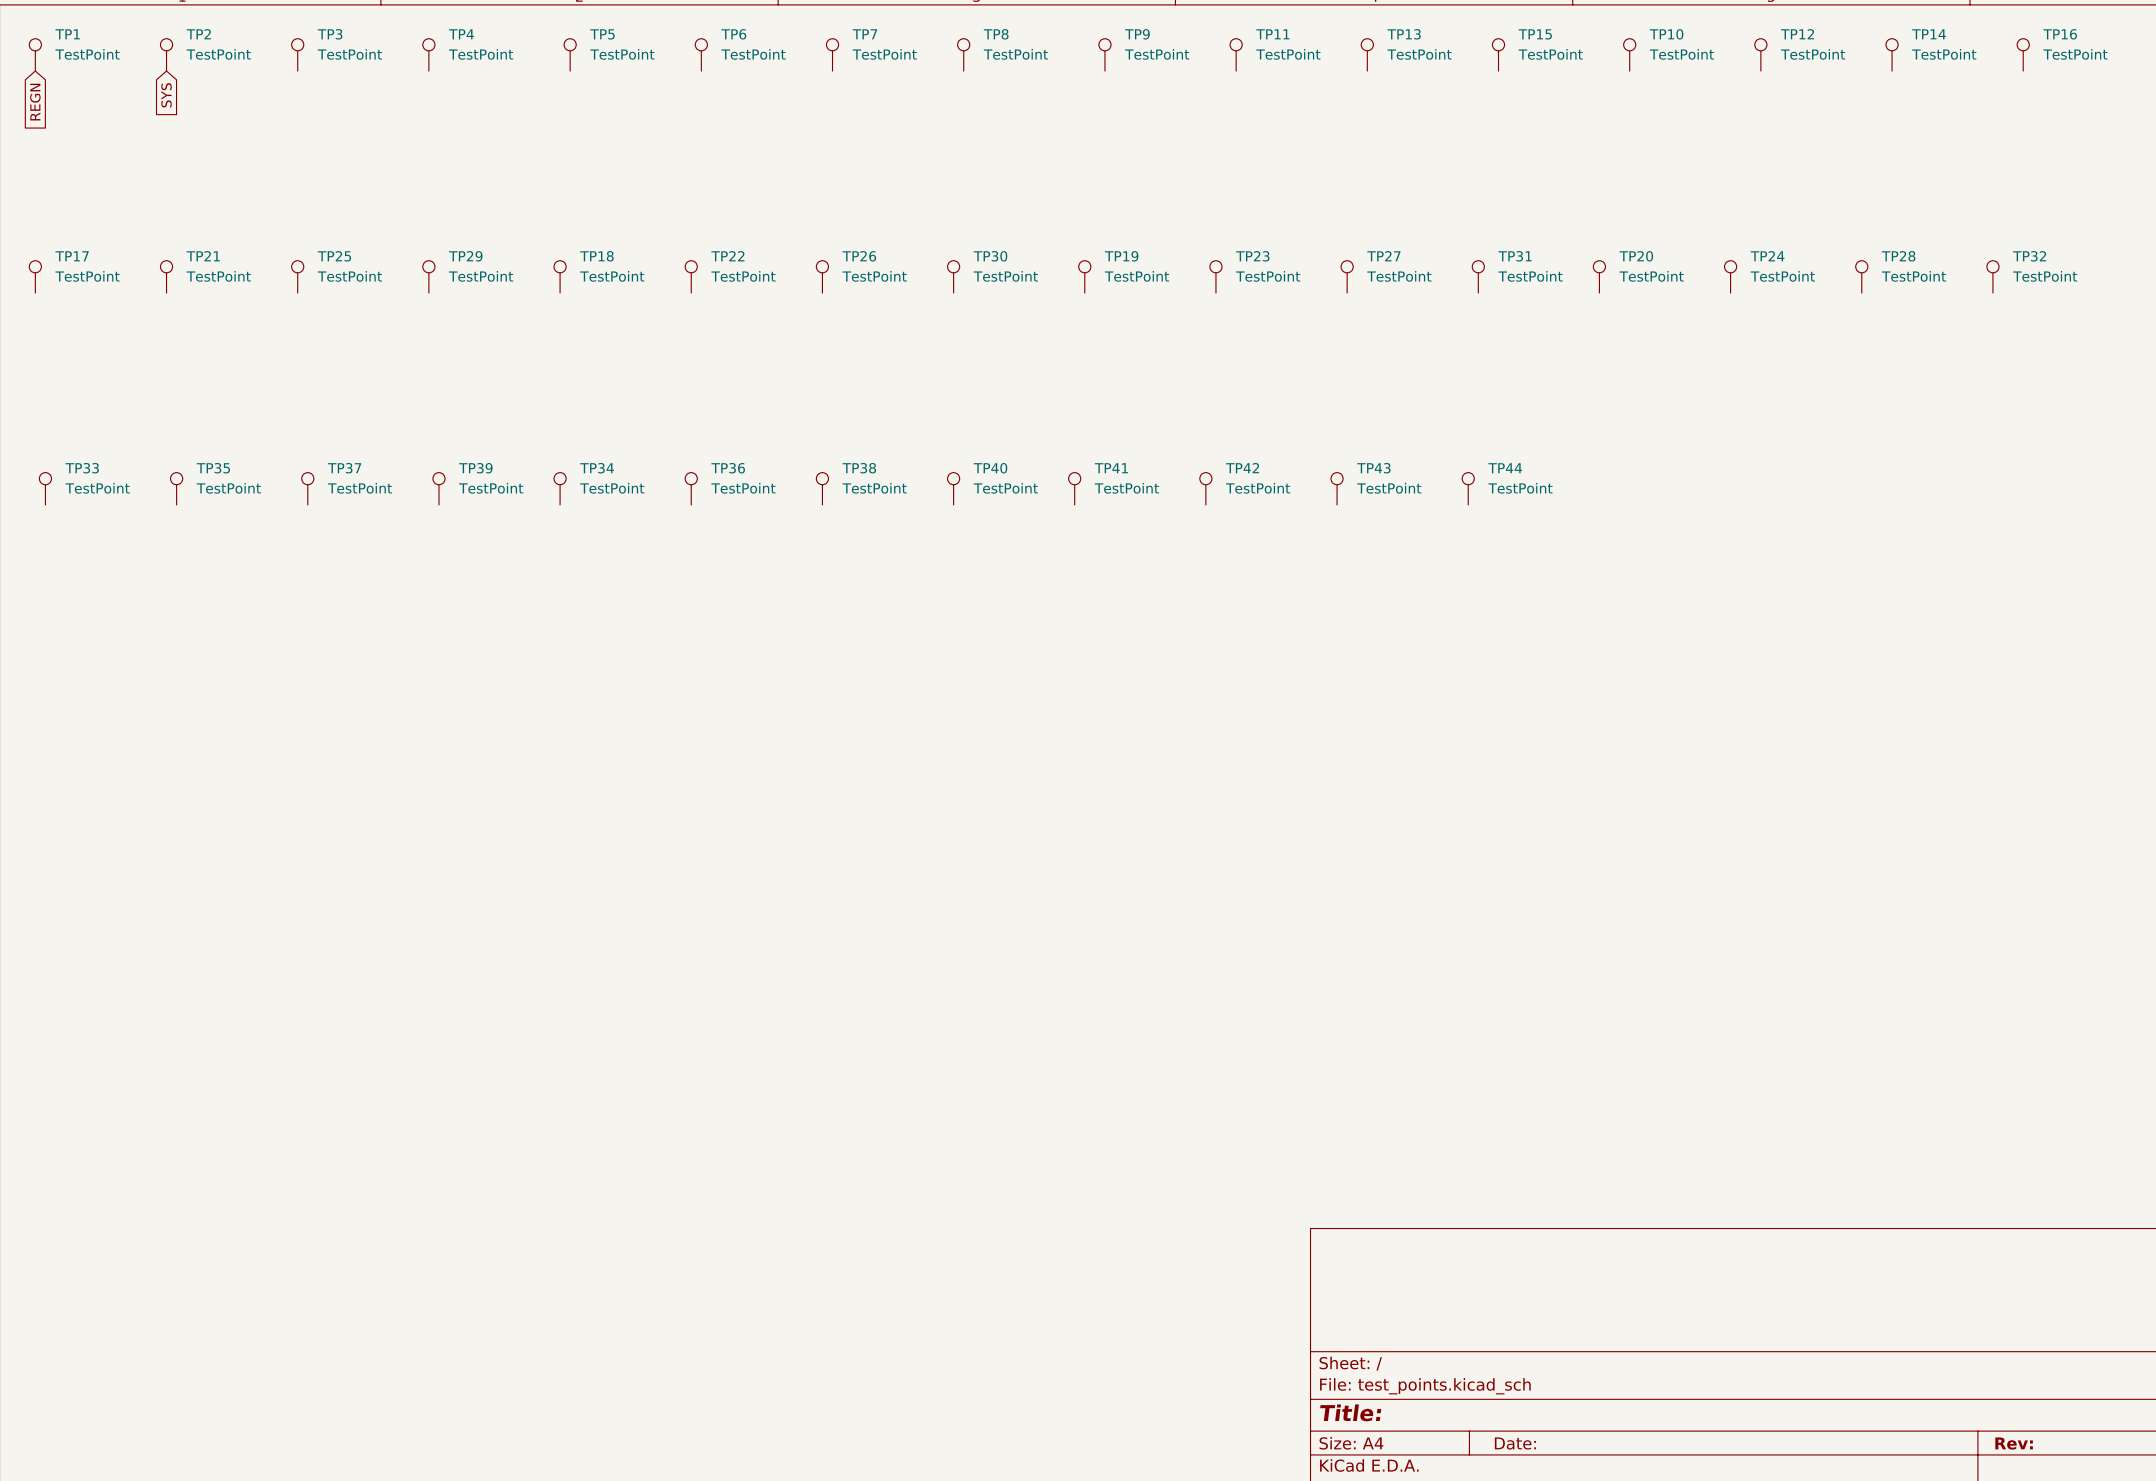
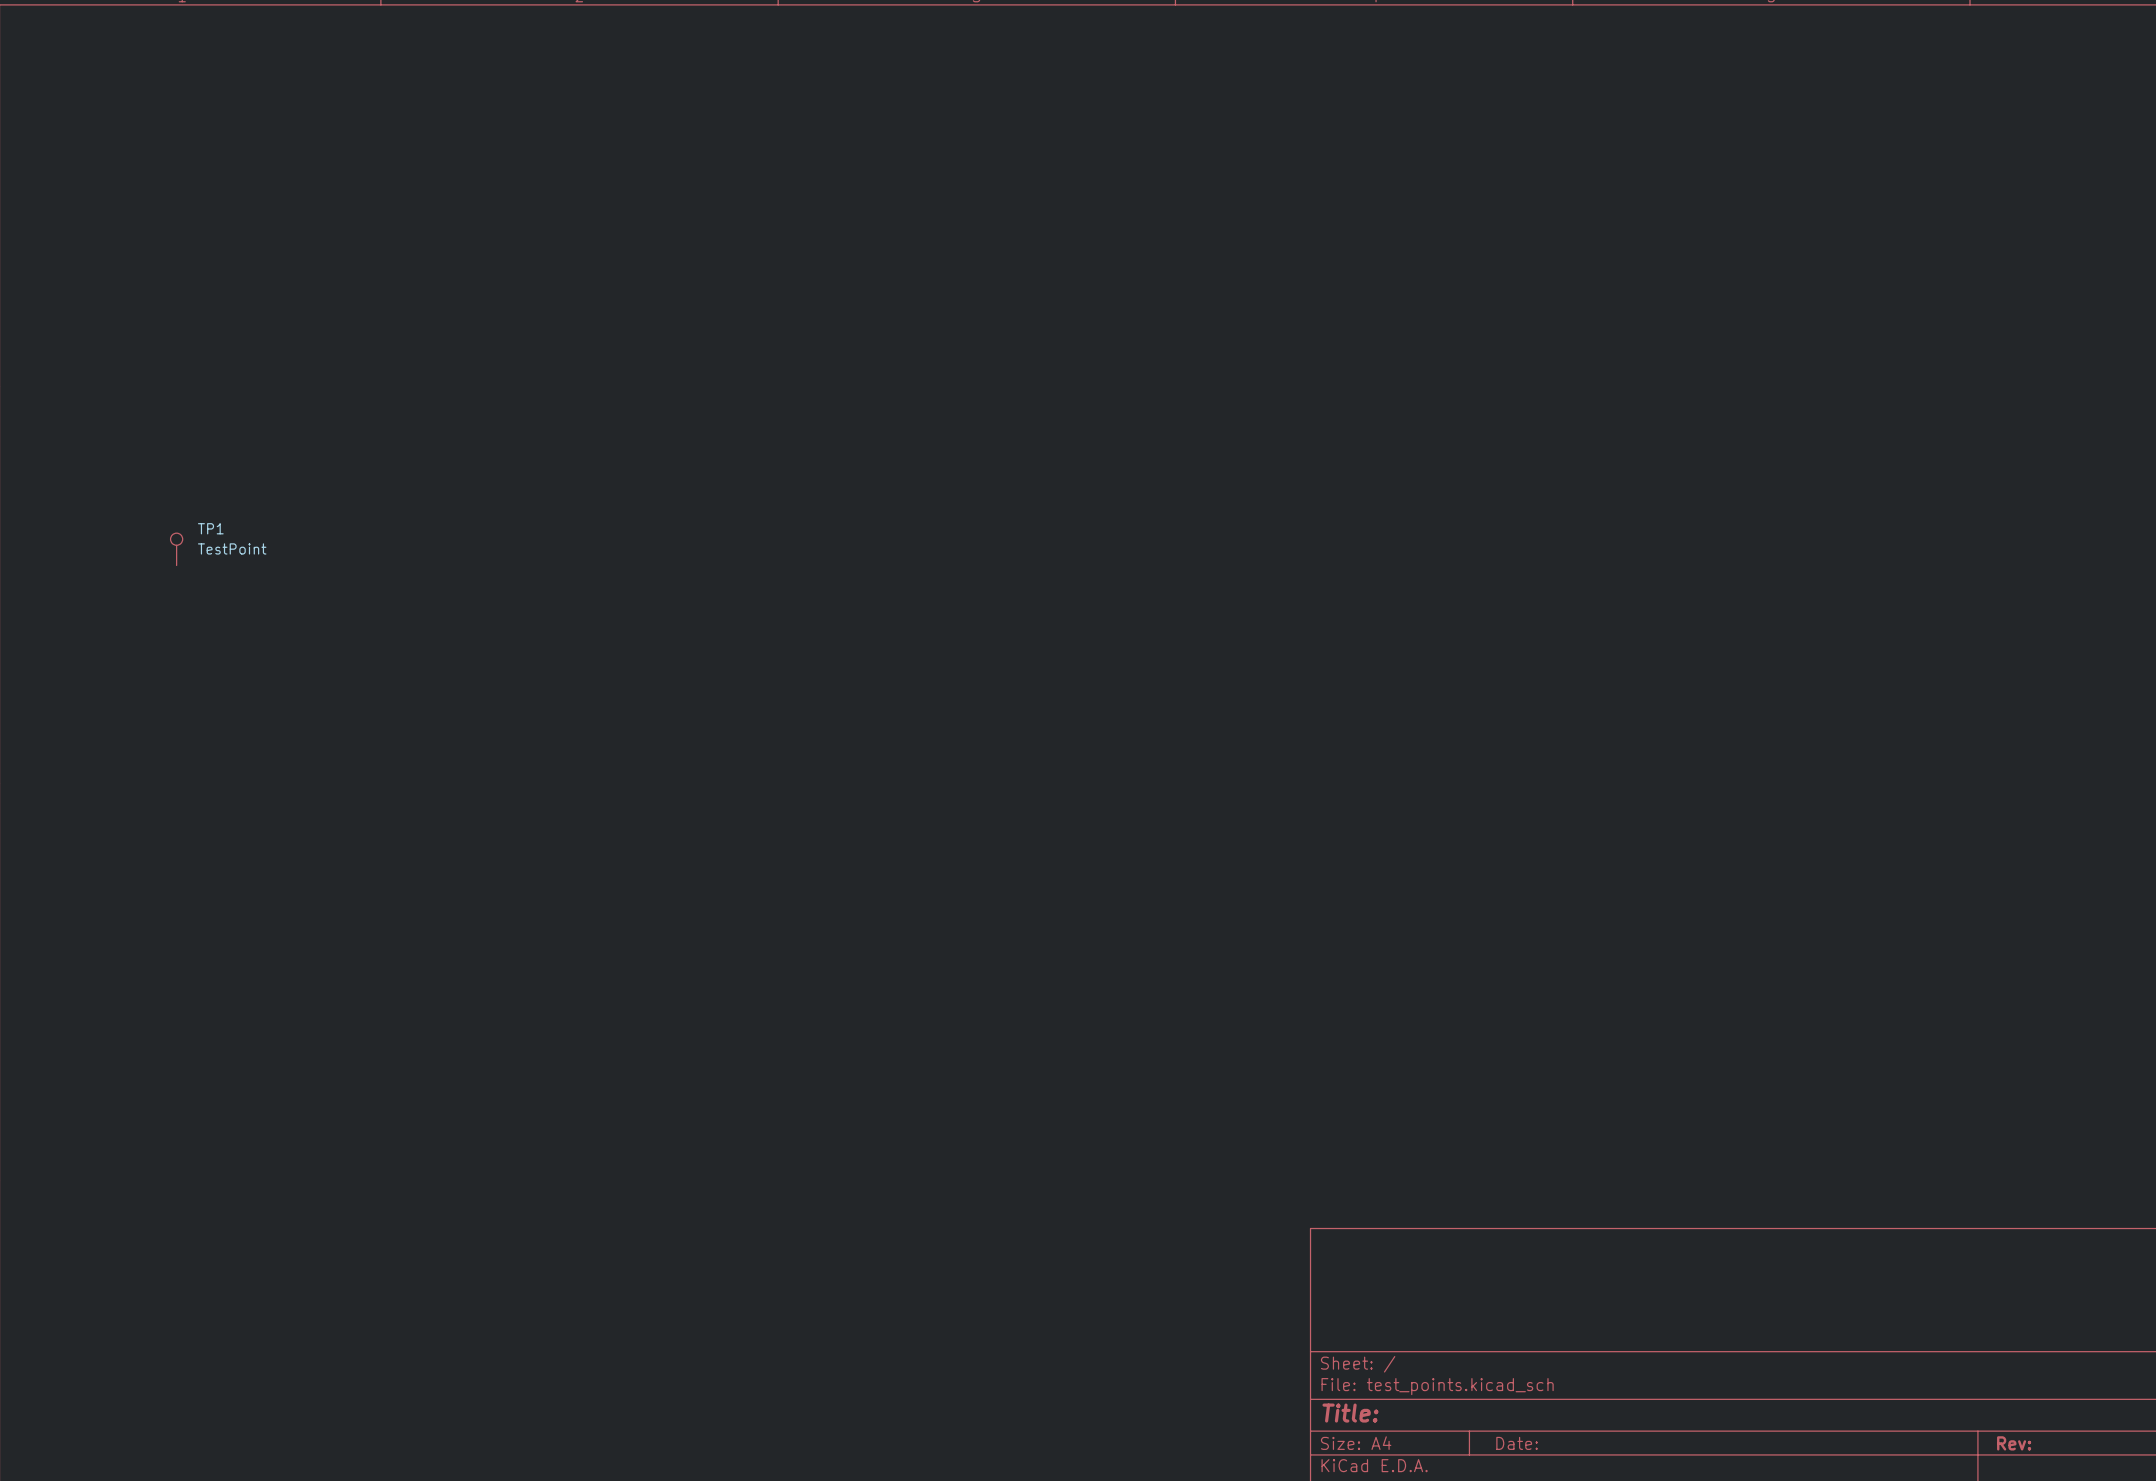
TP1 position: (35, 54) -> (176, 549)
TP2: TestPoint (166, 54) -> none
TP3: TestPoint (297, 54) -> none
TP4: TestPoint (428, 54) -> none
TP5: TestPoint (570, 54) -> none
TP6: TestPoint (701, 54) -> none
TP7: TestPoint (832, 54) -> none
TP8: TestPoint (963, 54) -> none
TP9: TestPoint (1104, 54) -> none
TP11: TestPoint (1236, 54) -> none
TP13: TestPoint (1367, 54) -> none
TP15: TestPoint (1498, 54) -> none
TP10: TestPoint (1629, 54) -> none
TP12: TestPoint (1760, 54) -> none
TP14: TestPoint (1892, 54) -> none
TP16: TestPoint (2023, 54) -> none
global label: SYS (166, 95) -> none
global label: REGN (35, 102) -> none
TP17: TestPoint (35, 276) -> none
TP21: TestPoint (166, 276) -> none
TP25: TestPoint (297, 276) -> none
TP29: TestPoint (428, 276) -> none
TP18: TestPoint (560, 276) -> none
TP22: TestPoint (691, 276) -> none
TP26: TestPoint (822, 276) -> none
TP30: TestPoint (953, 276) -> none
TP19: TestPoint (1084, 276) -> none
TP23: TestPoint (1215, 276) -> none
TP27: TestPoint (1347, 276) -> none
TP31: TestPoint (1478, 276) -> none
TP20: TestPoint (1599, 276) -> none
TP24: TestPoint (1730, 276) -> none
TP28: TestPoint (1861, 276) -> none
TP32: TestPoint (1992, 276) -> none
TP33: TestPoint (45, 488) -> none
TP35: TestPoint (176, 488) -> none
TP37: TestPoint (307, 488) -> none
TP39: TestPoint (438, 488) -> none
TP34: TestPoint (560, 488) -> none
TP36: TestPoint (691, 488) -> none
TP38: TestPoint (822, 488) -> none
TP40: TestPoint (953, 488) -> none
TP41: TestPoint (1074, 488) -> none
TP42: TestPoint (1205, 488) -> none
TP43: TestPoint (1337, 488) -> none
TP44: TestPoint (1468, 488) -> none

